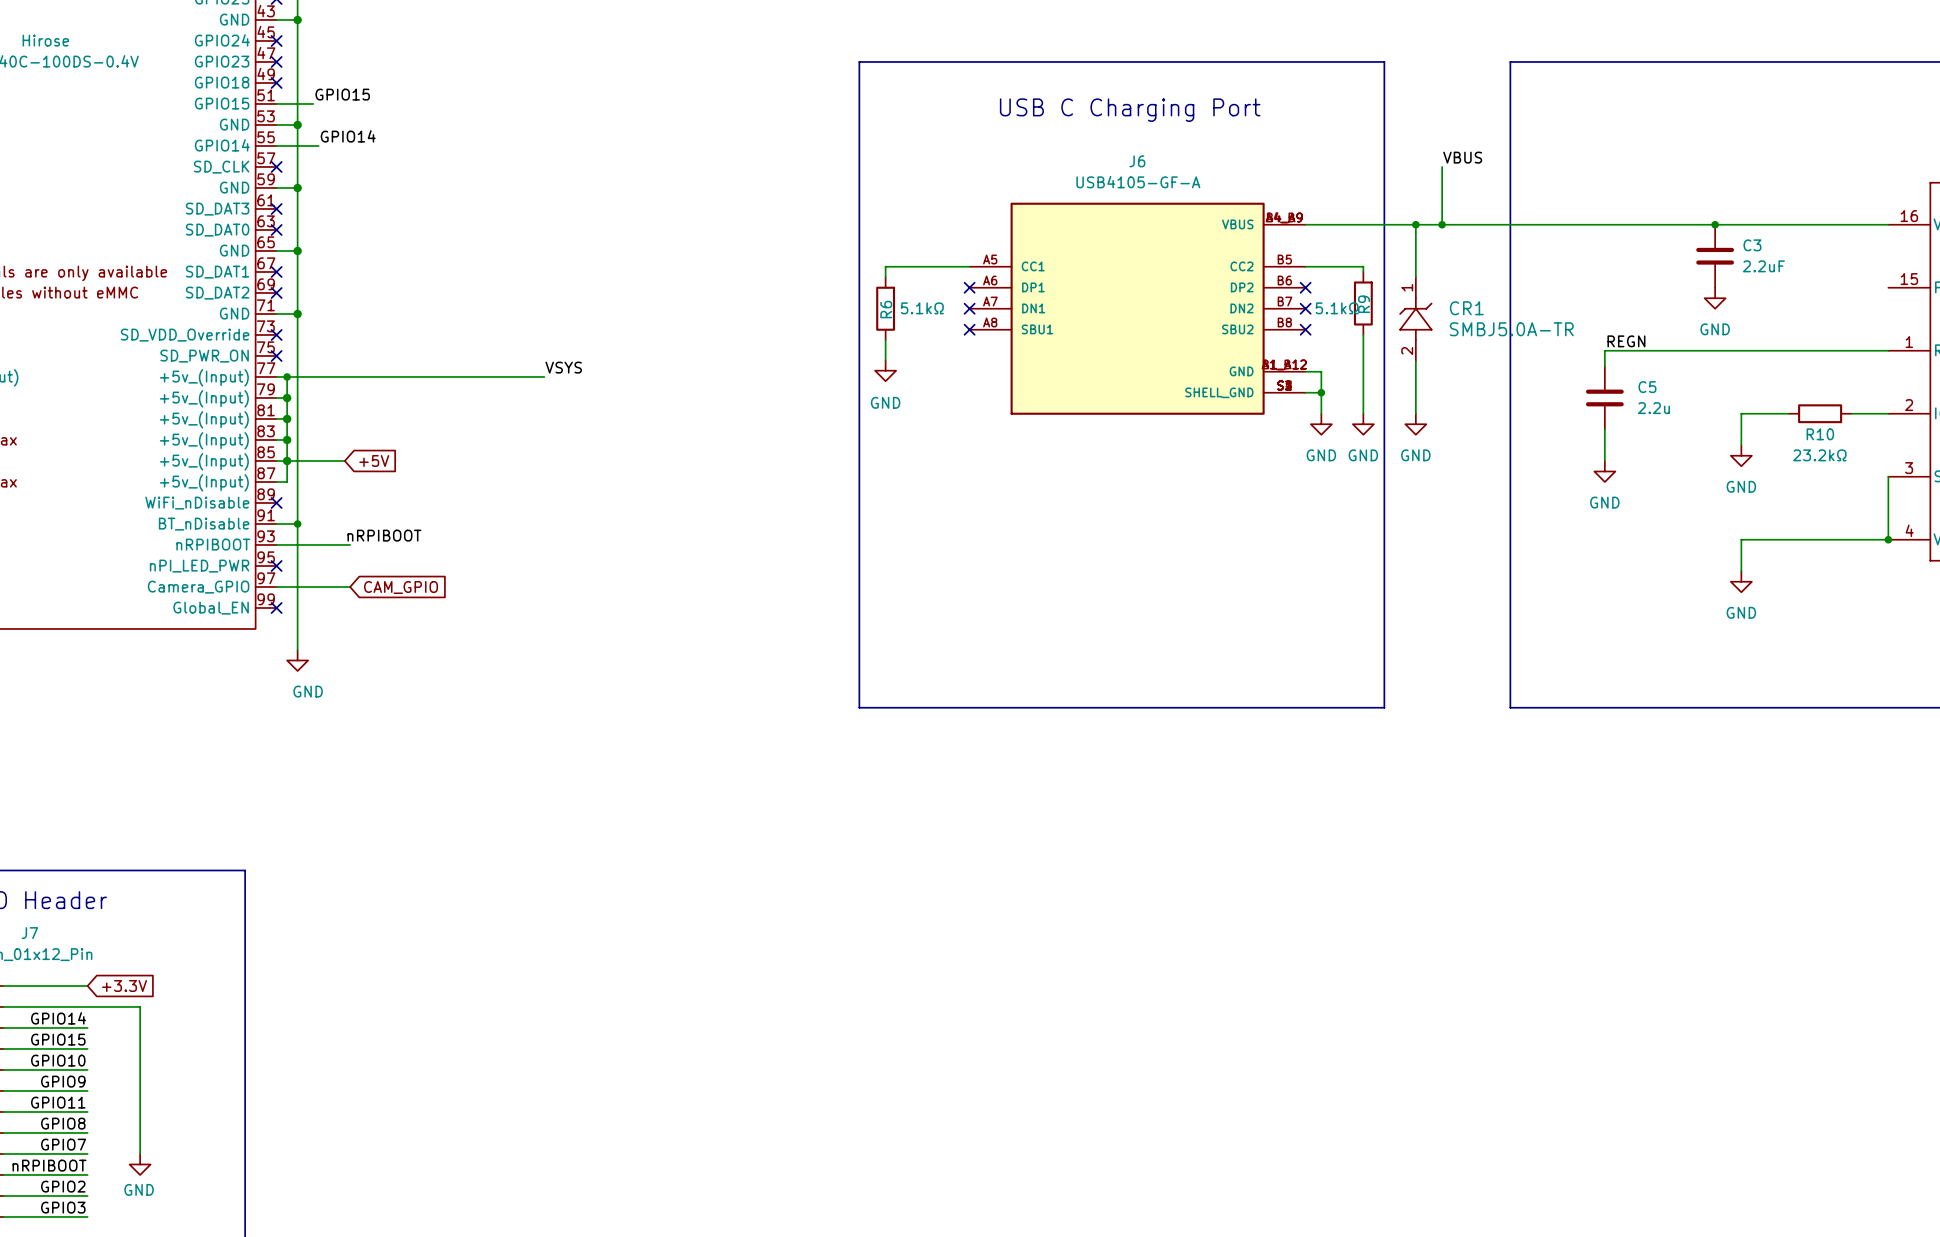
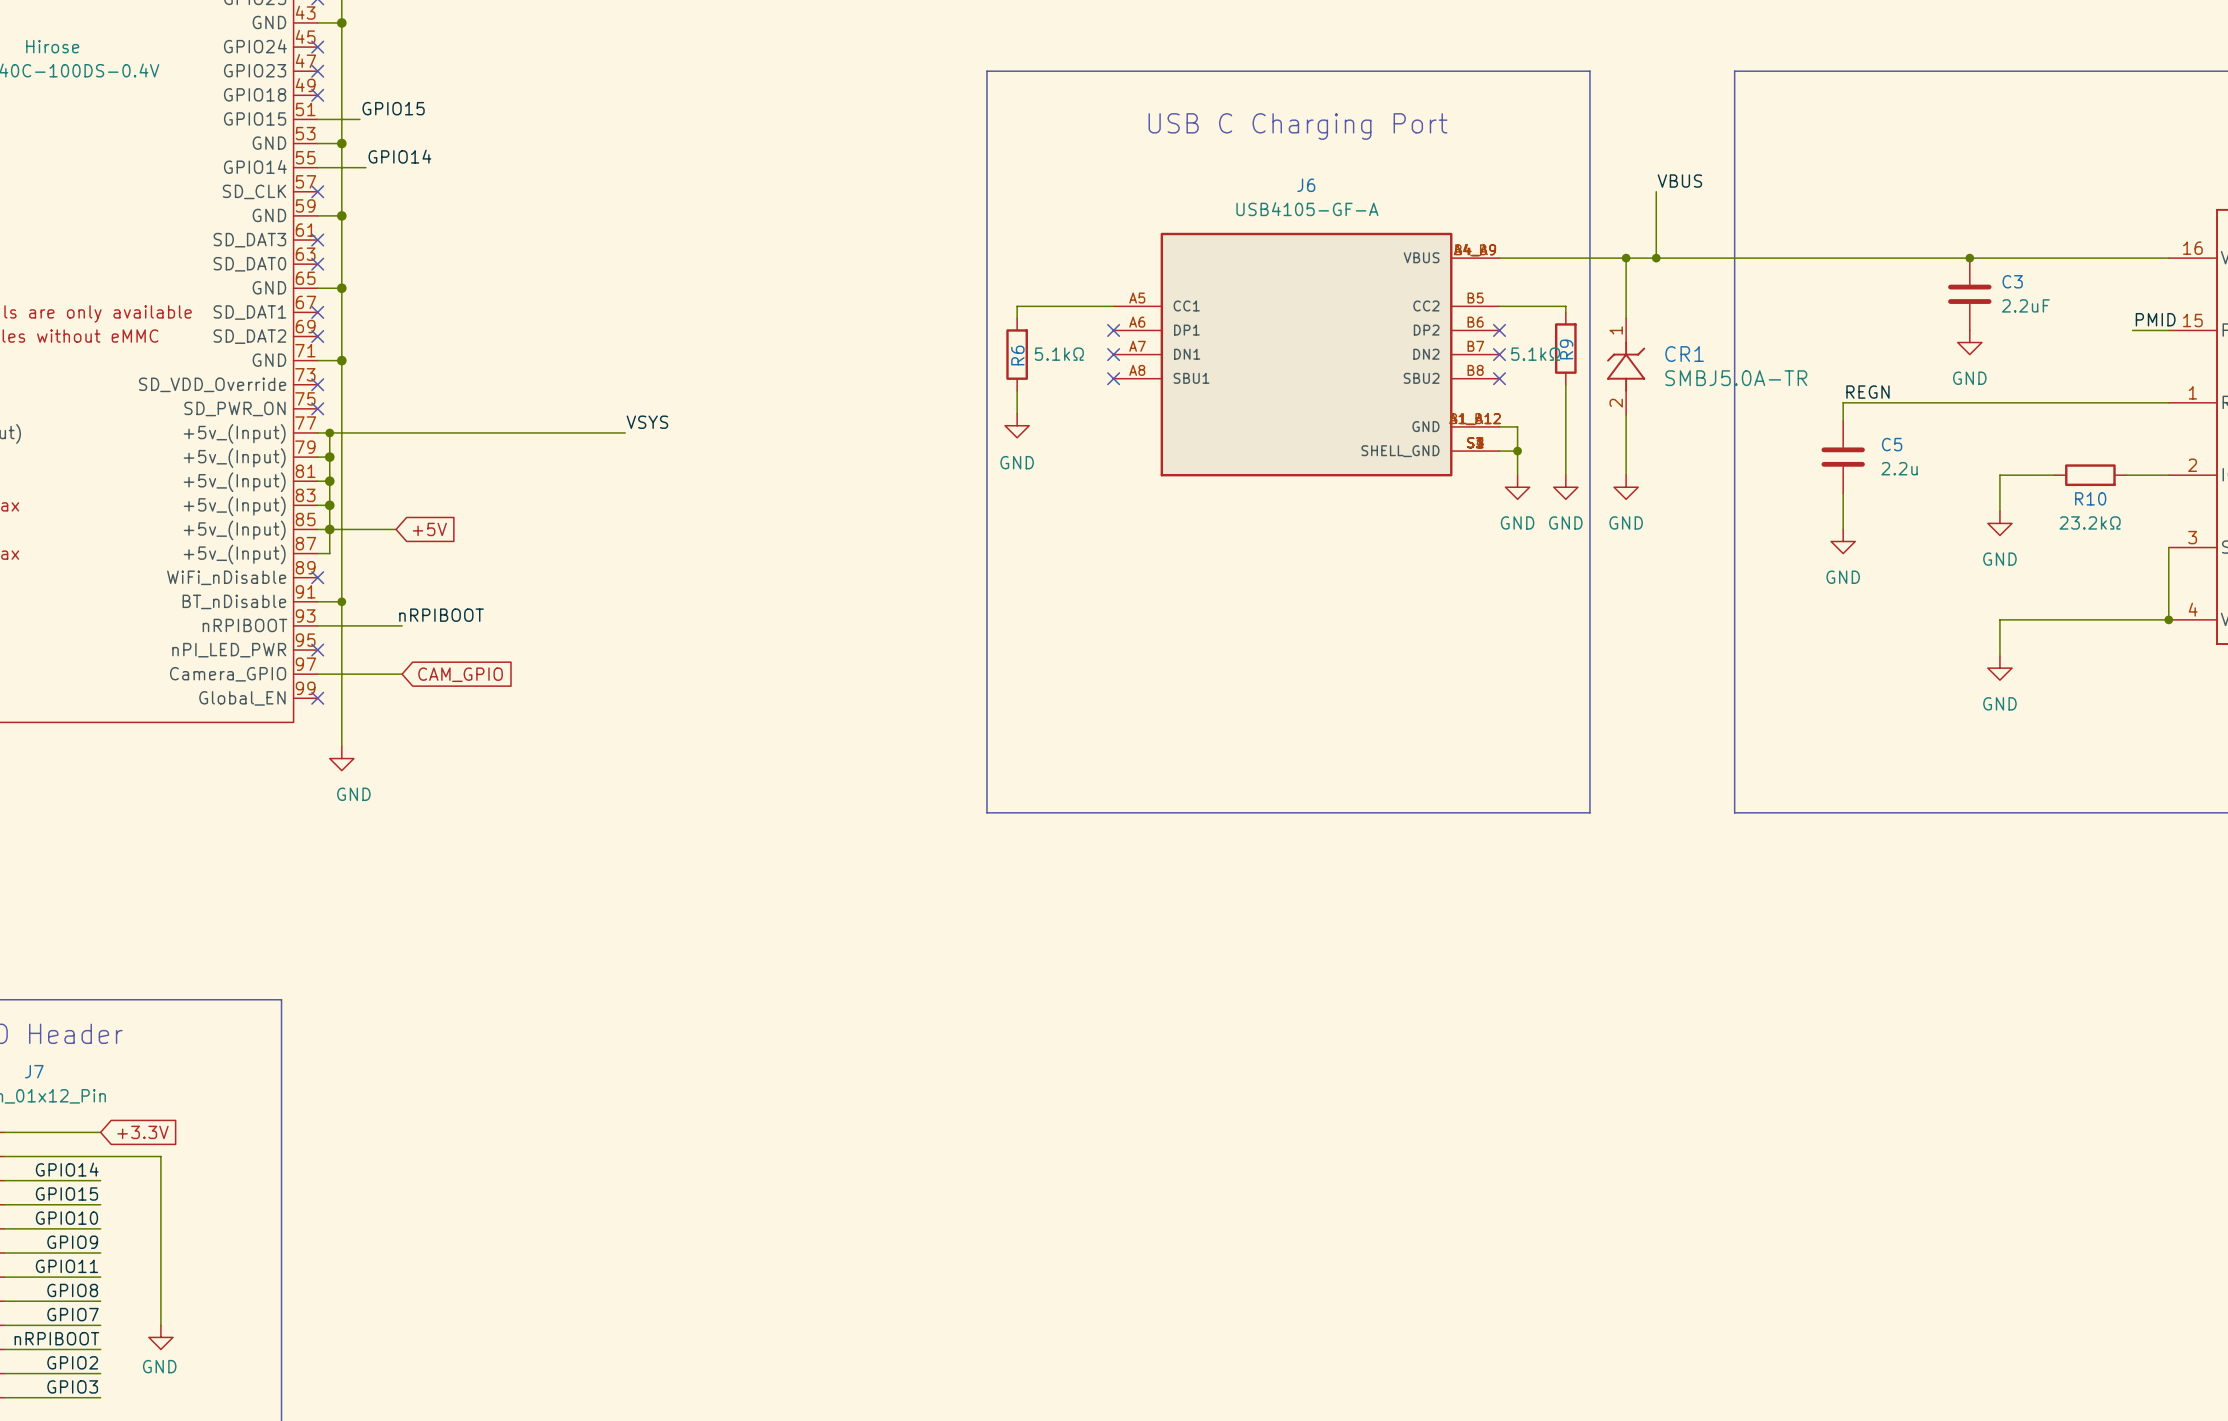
label: none -> PMID (2155, 319)
wire: none -> (2132, 330) (2168, 330)

